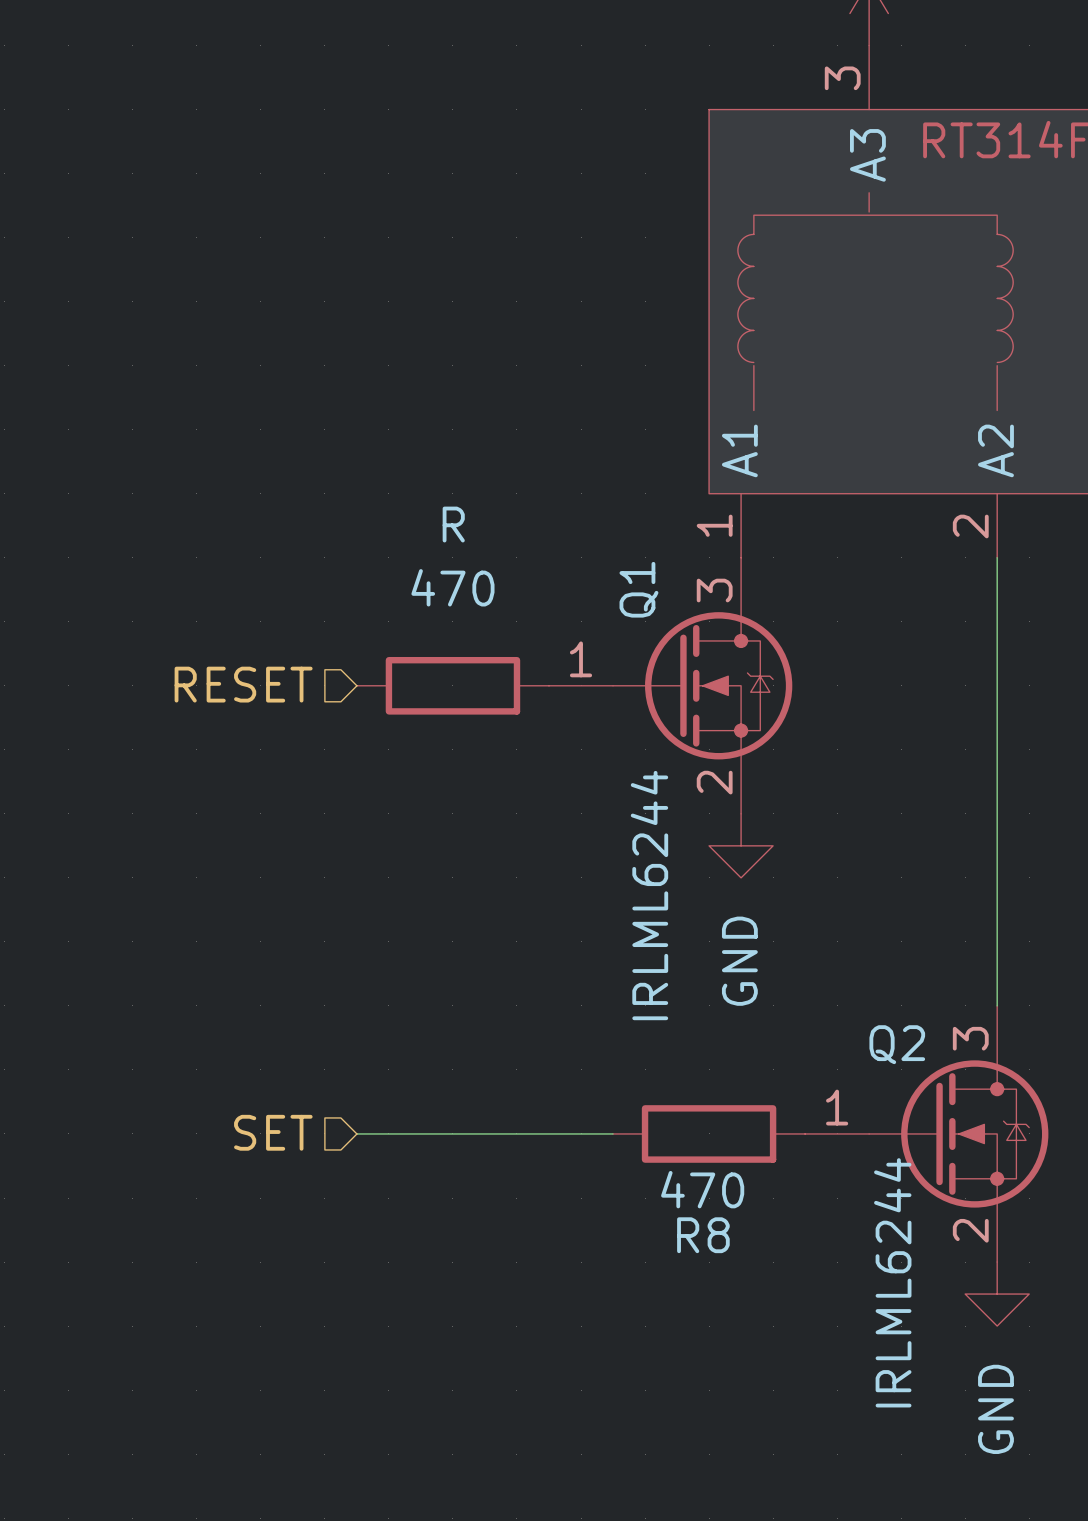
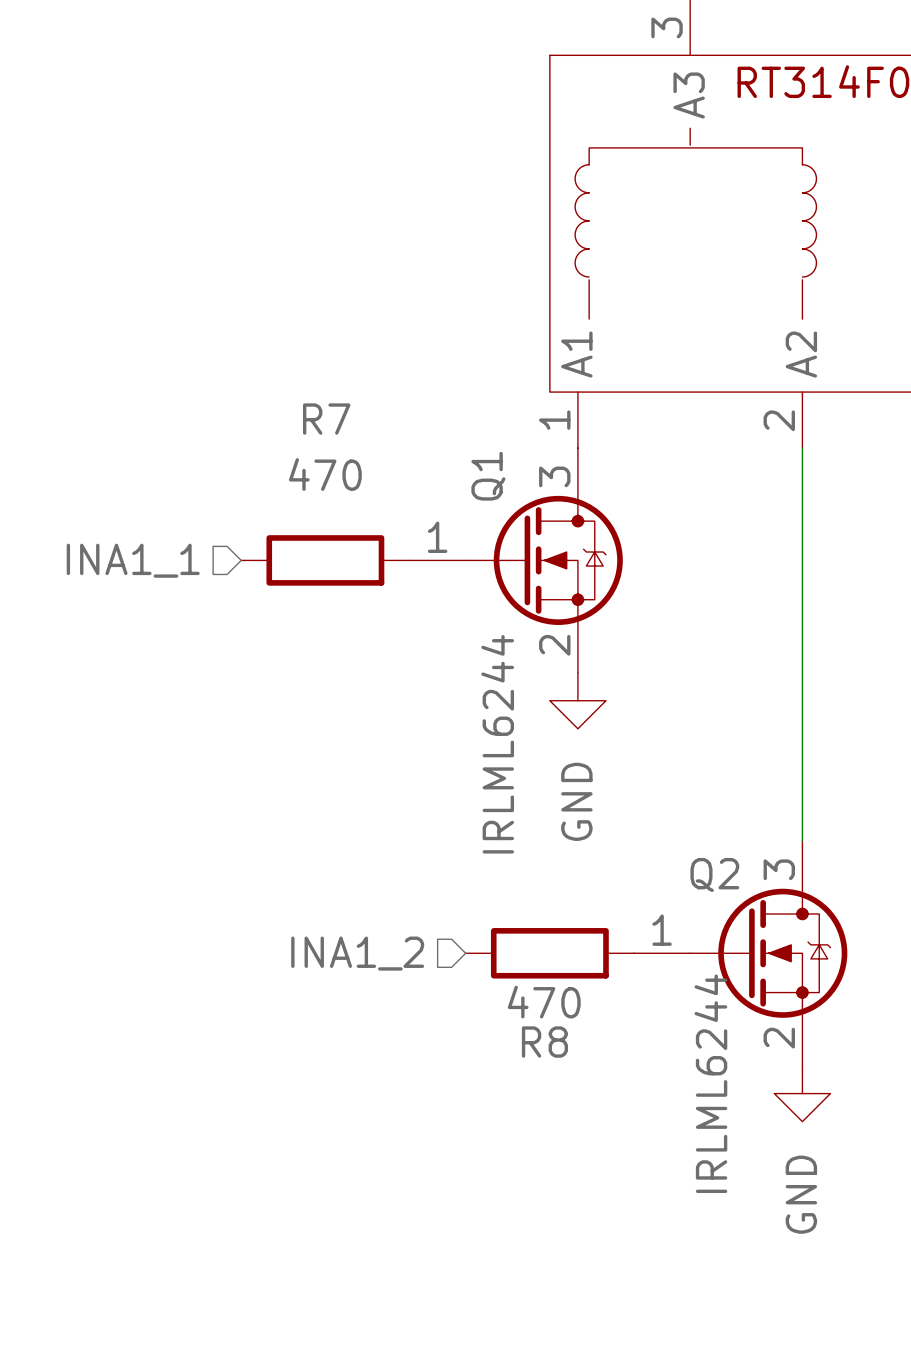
R name: R (453, 524) -> R7 (326, 419)
hierarchical label: RESET (243, 684) -> INA1_1 (133, 560)
hierarchical label: SET (273, 1132) -> none
wire: (356, 1133) (613, 1133) -> none
hierarchical label: none -> INA1_2 (357, 953)

